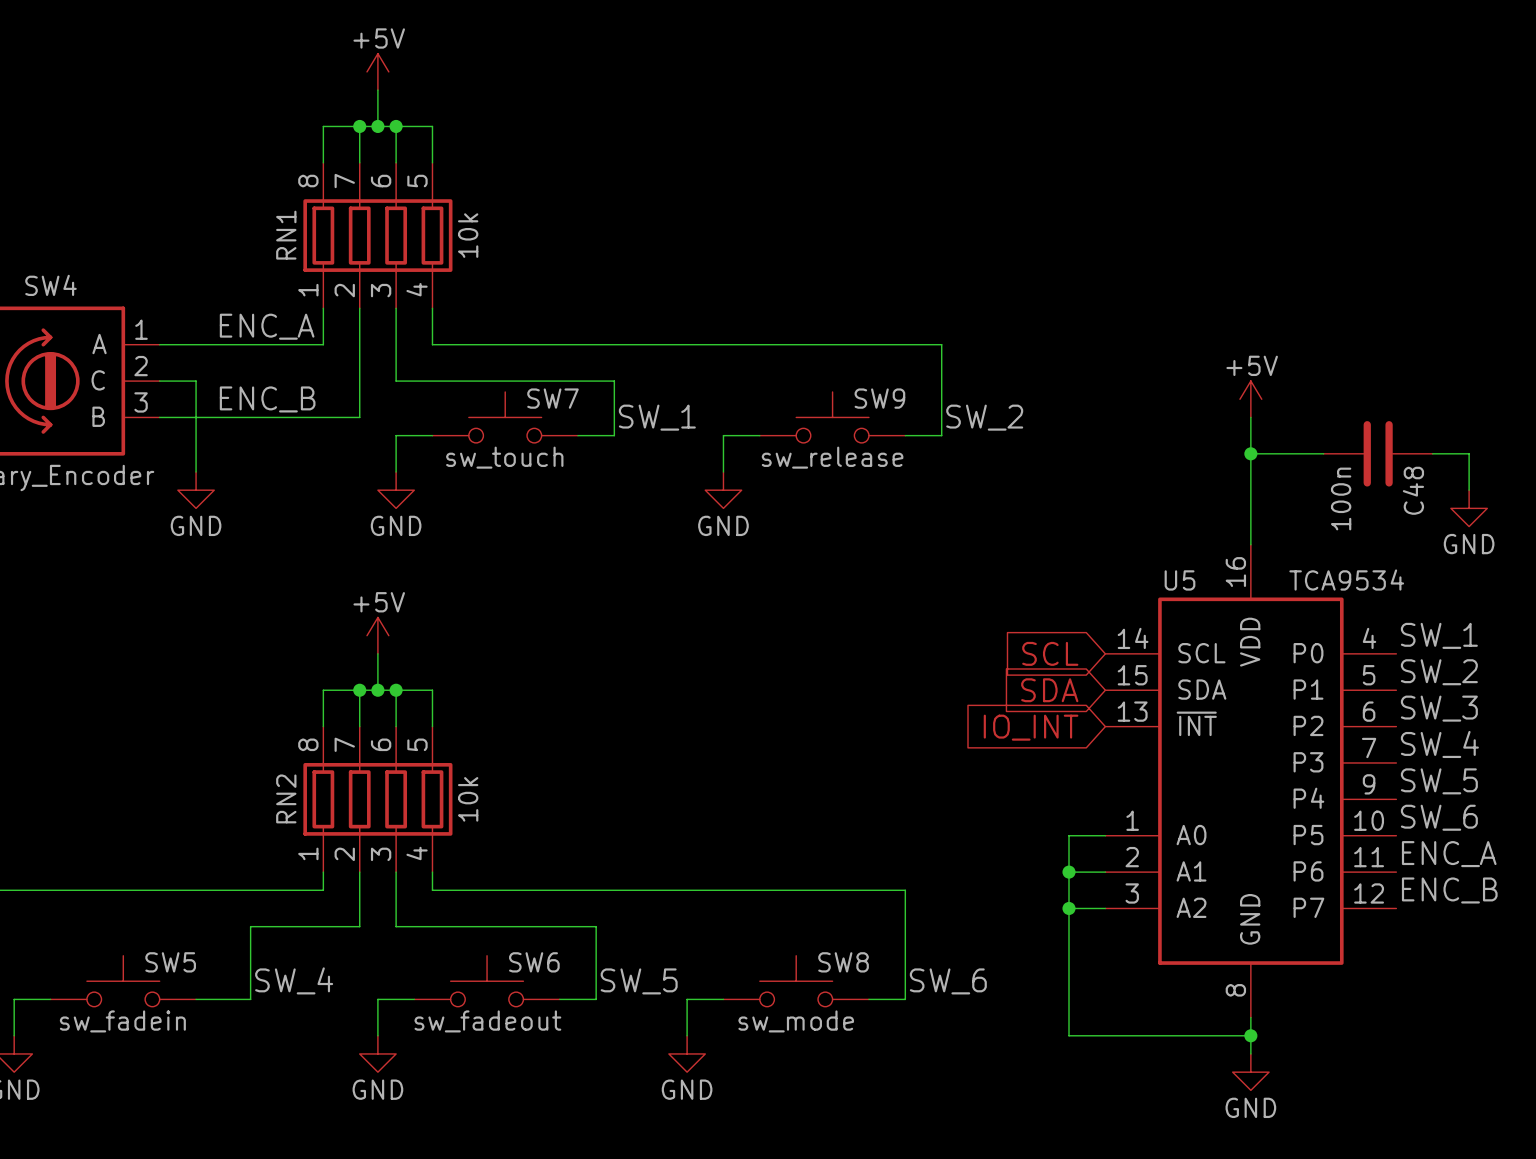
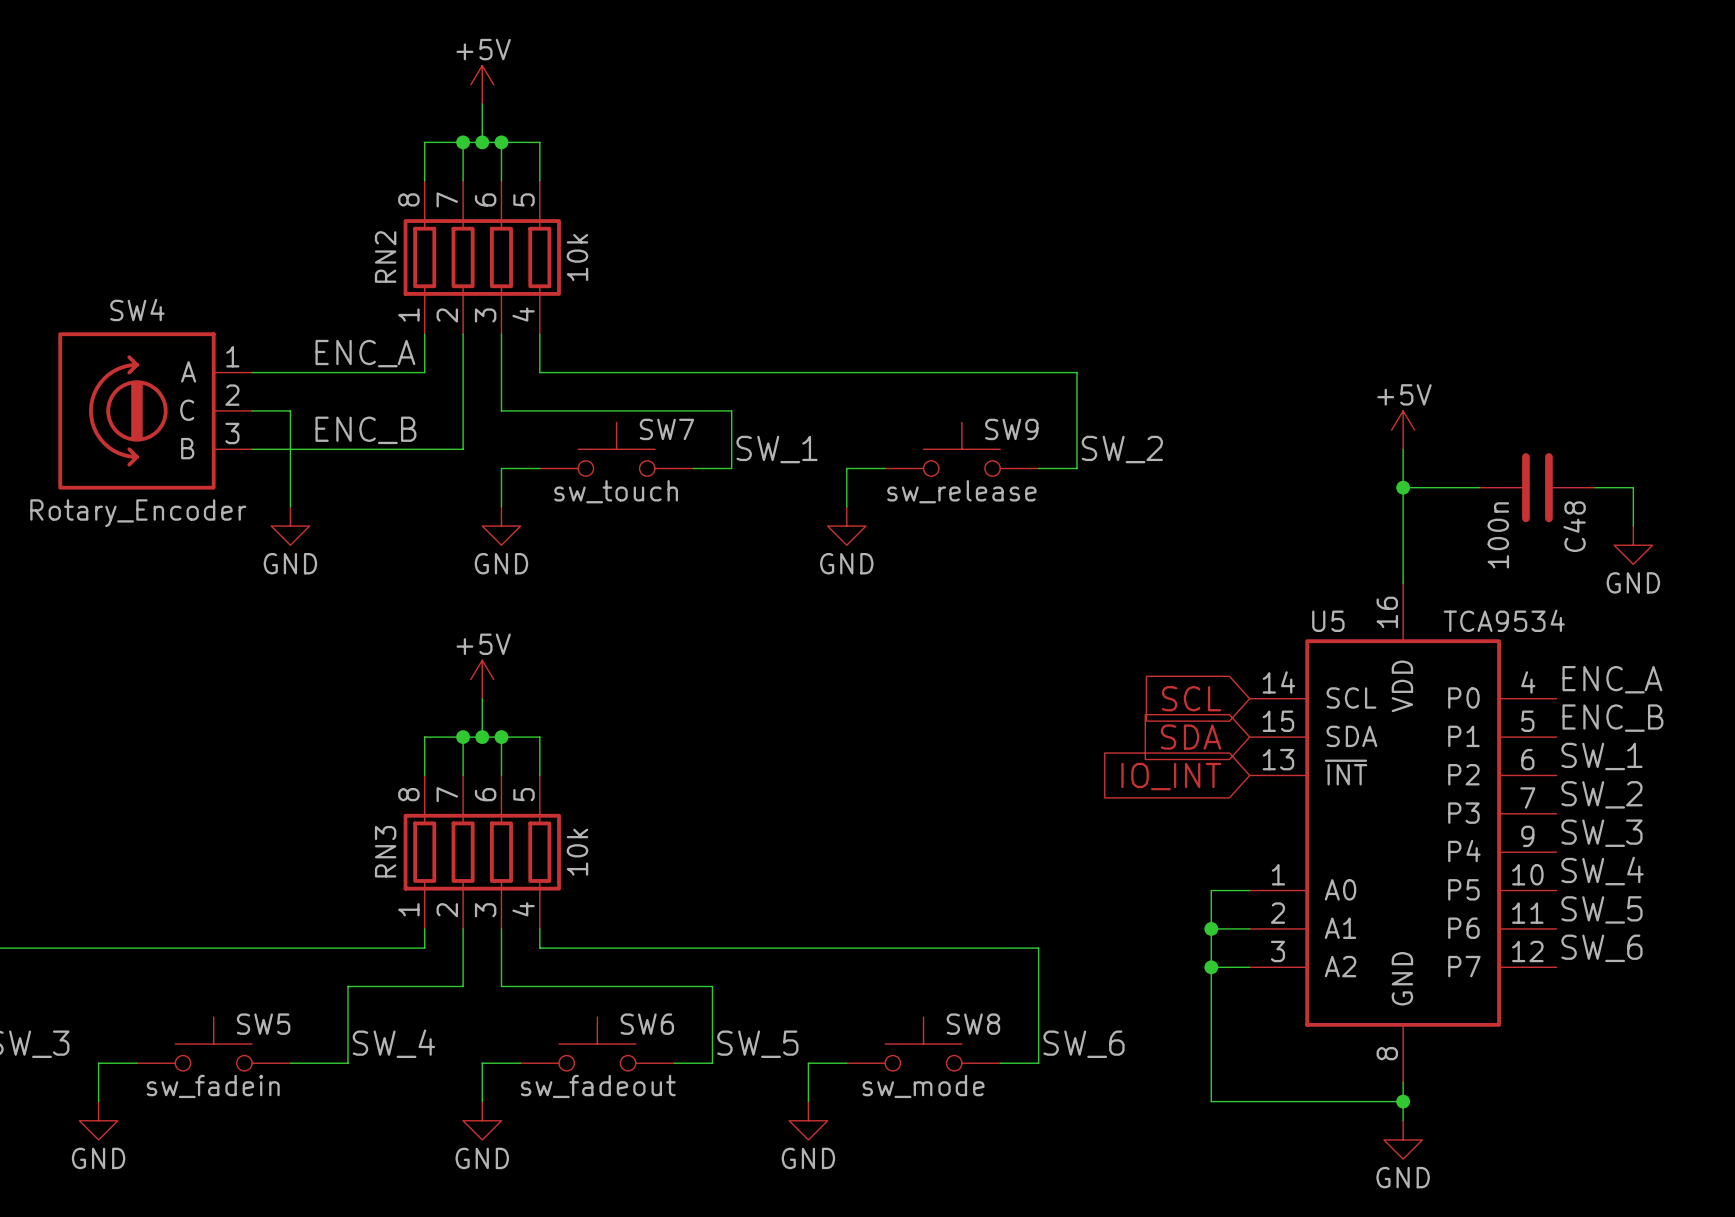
RN1 name: RN1 (286, 235) -> RN2 (385, 257)
label: SW_1 (1439, 635) -> ENC_A (1612, 679)
label: SW_2 (1439, 672) -> ENC_B (1612, 718)
label: SW_3 (1439, 708) -> SW_1 (1601, 756)
label: SW_4 (1439, 744) -> SW_2 (1601, 794)
label: SW_5 (1439, 781) -> SW_3 (1601, 833)
RN2 name: RN2 (286, 798) -> RN3 (385, 851)
label: SW_6 (1439, 817) -> SW_4 (1602, 871)
label: ENC_A (1449, 854) -> SW_5 (1601, 909)
label: ENC_B (1449, 890) -> SW_6 (1601, 948)

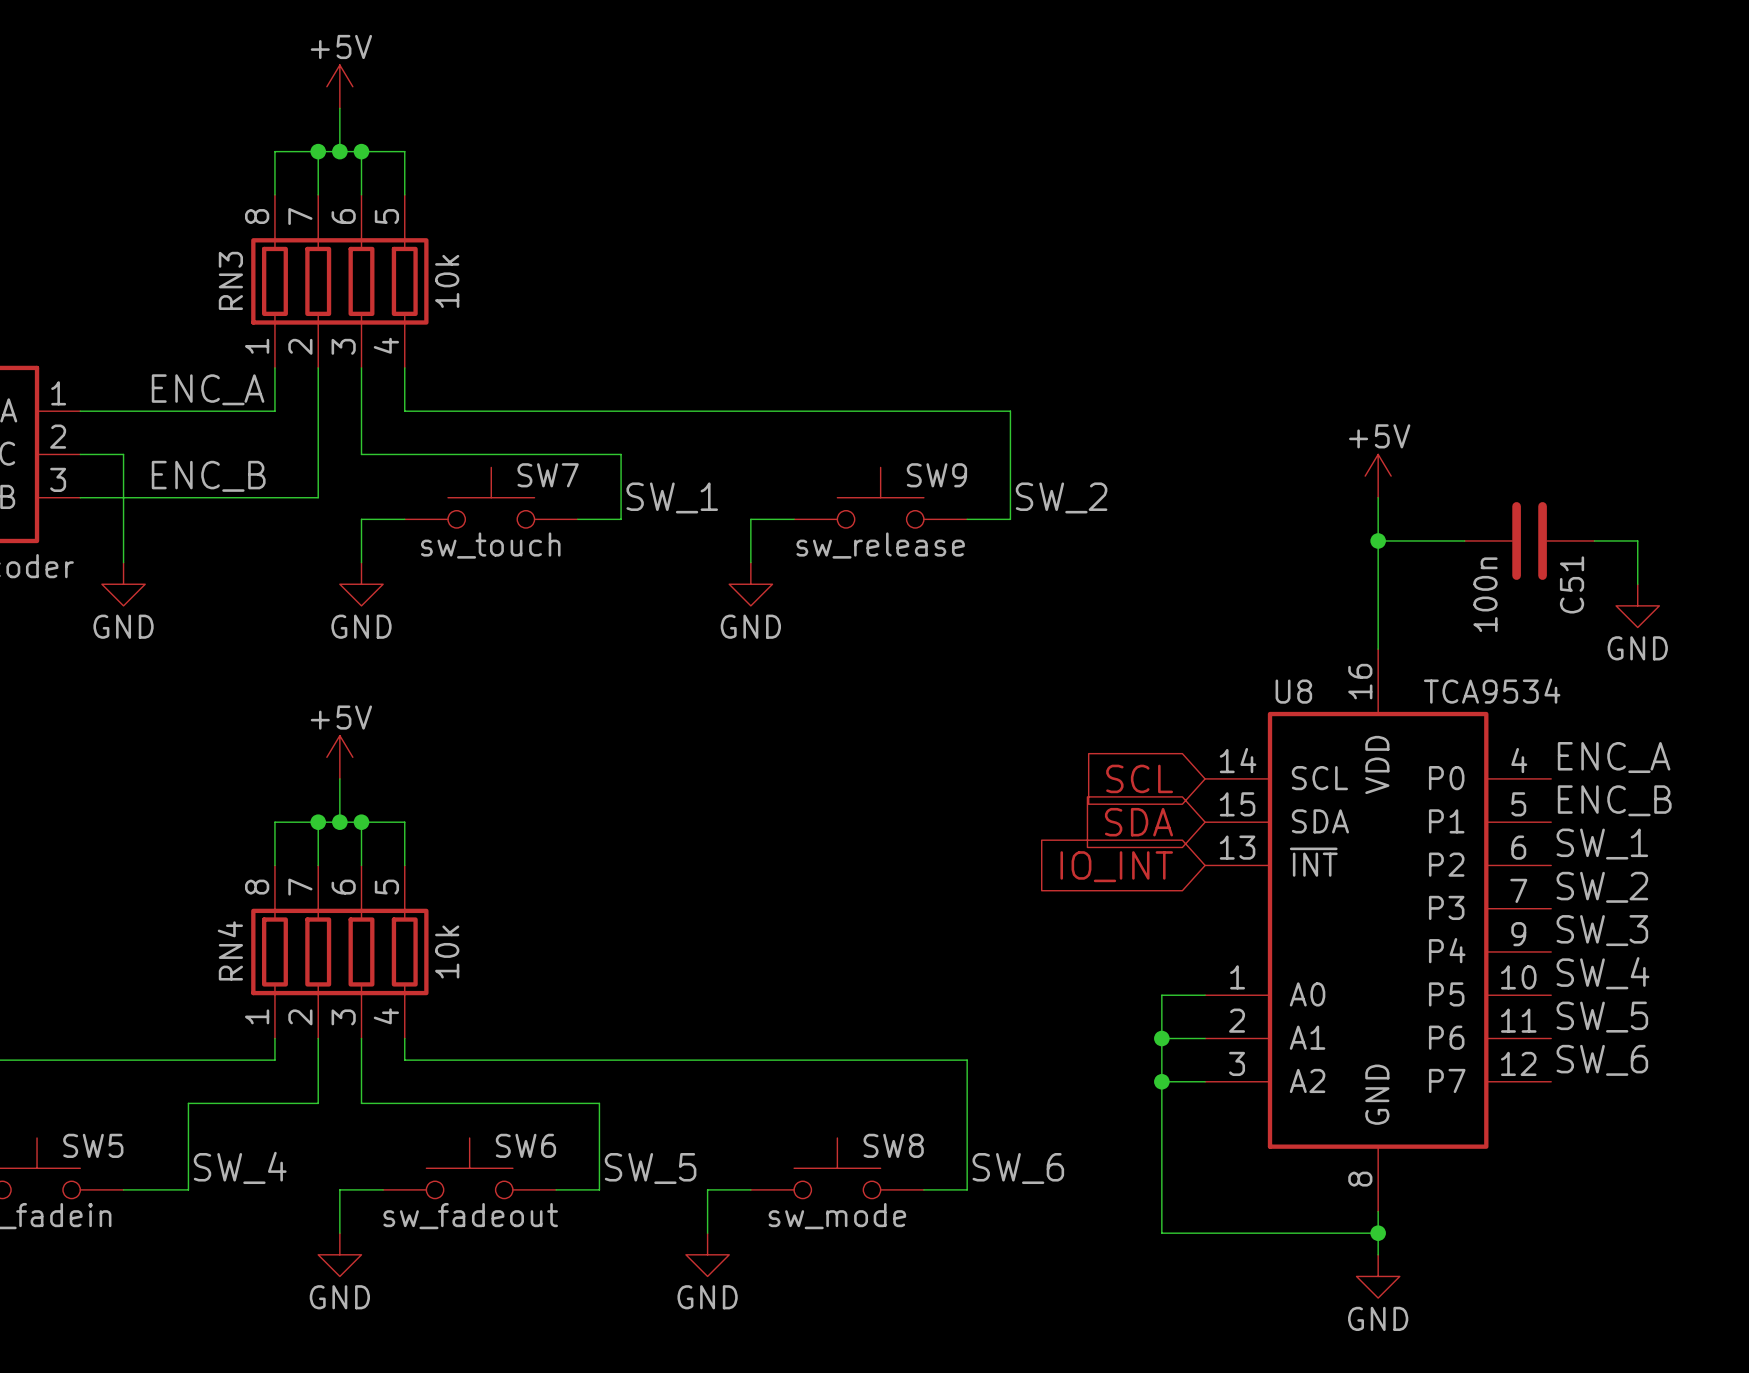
RN2 name: RN2 (385, 257) -> RN3 (230, 280)
C48 name: C48 (1574, 526) -> C51 (1572, 584)
U5 name: U5 (1328, 621) -> U8 (1293, 691)
RN3 name: RN3 (385, 851) -> RN4 (230, 950)

